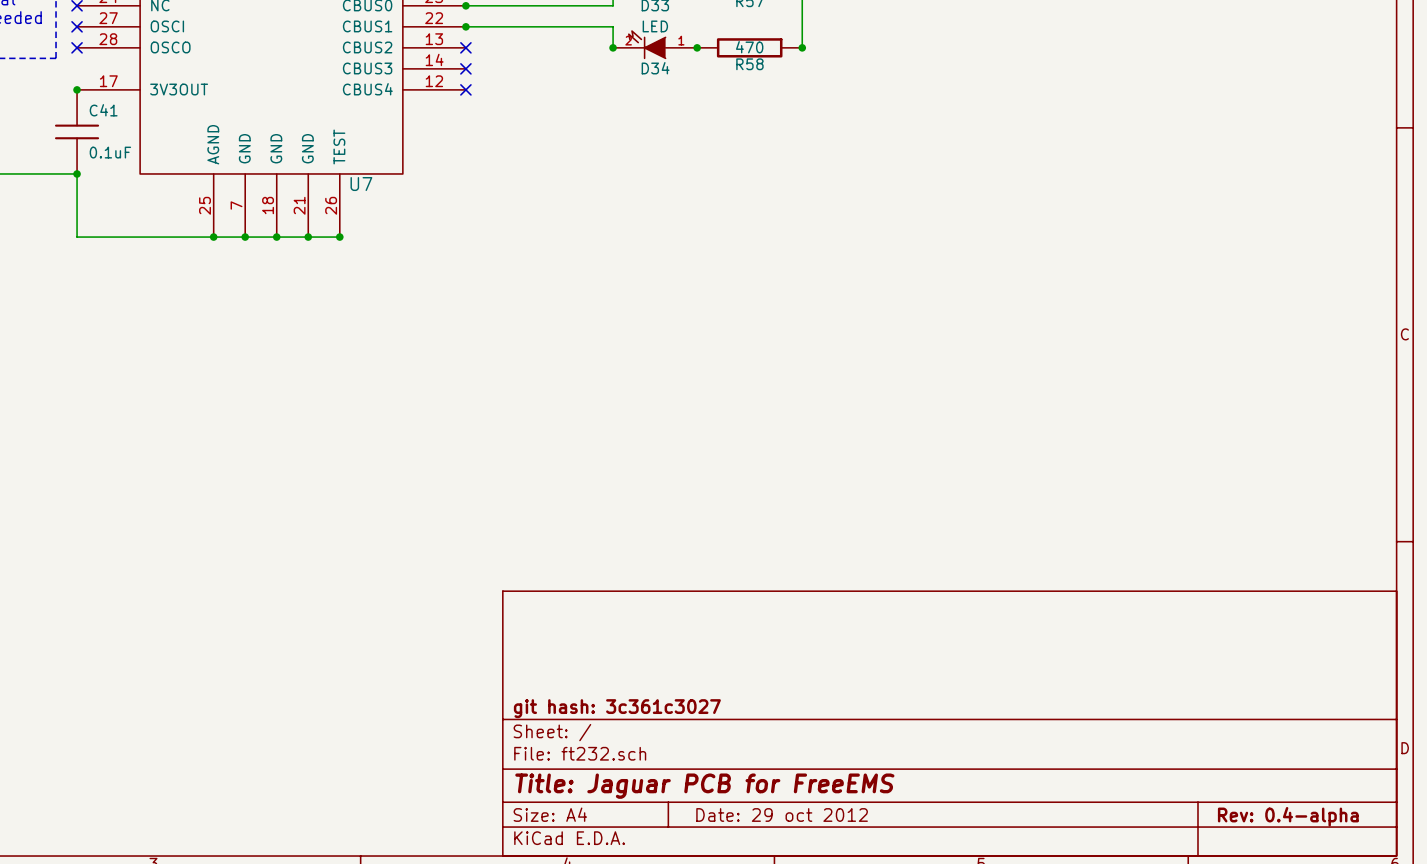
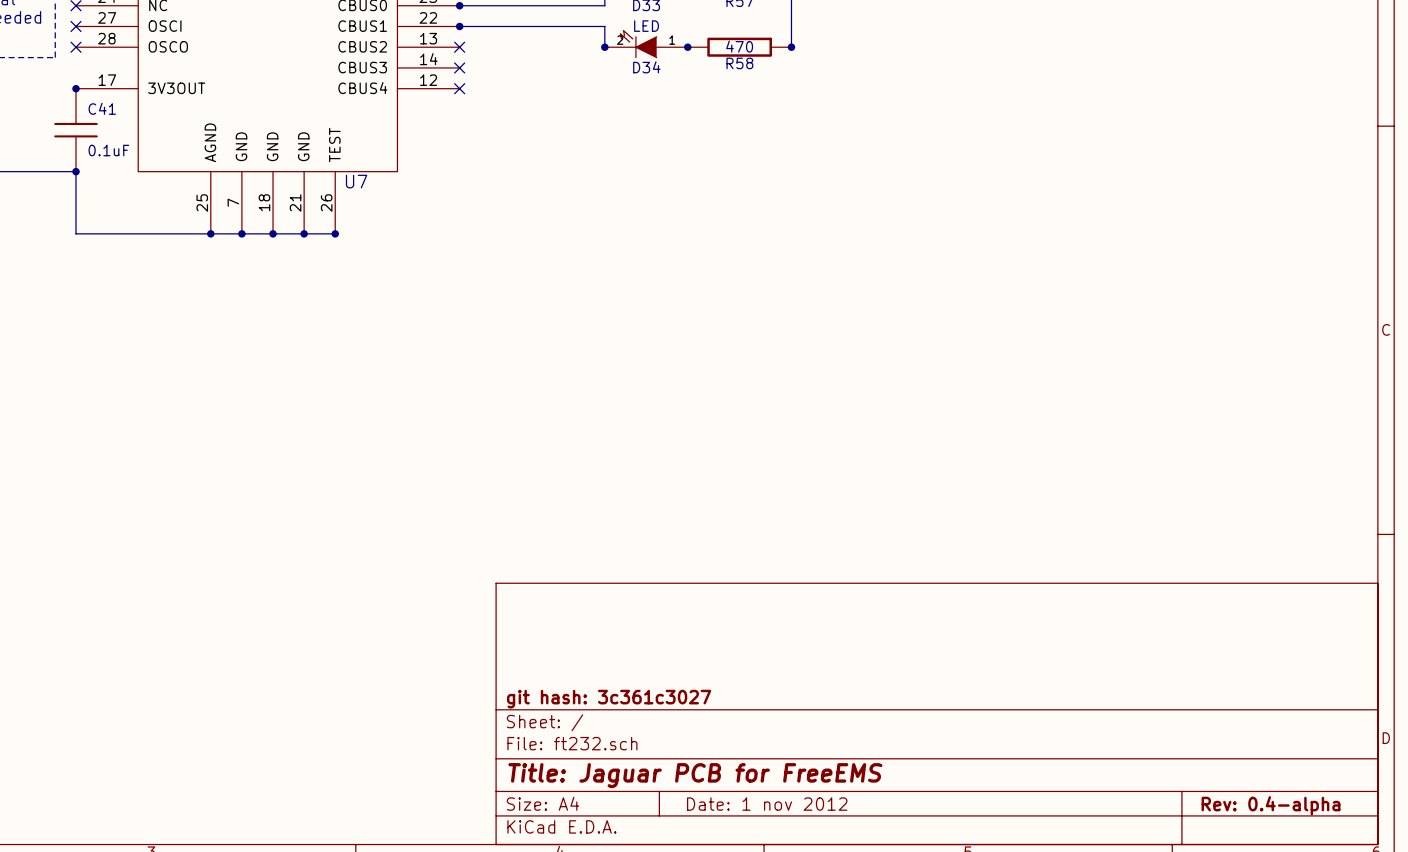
title block: Date: 29 oct 2012 (782, 814) -> Date: 1 nov 2012 (767, 804)

